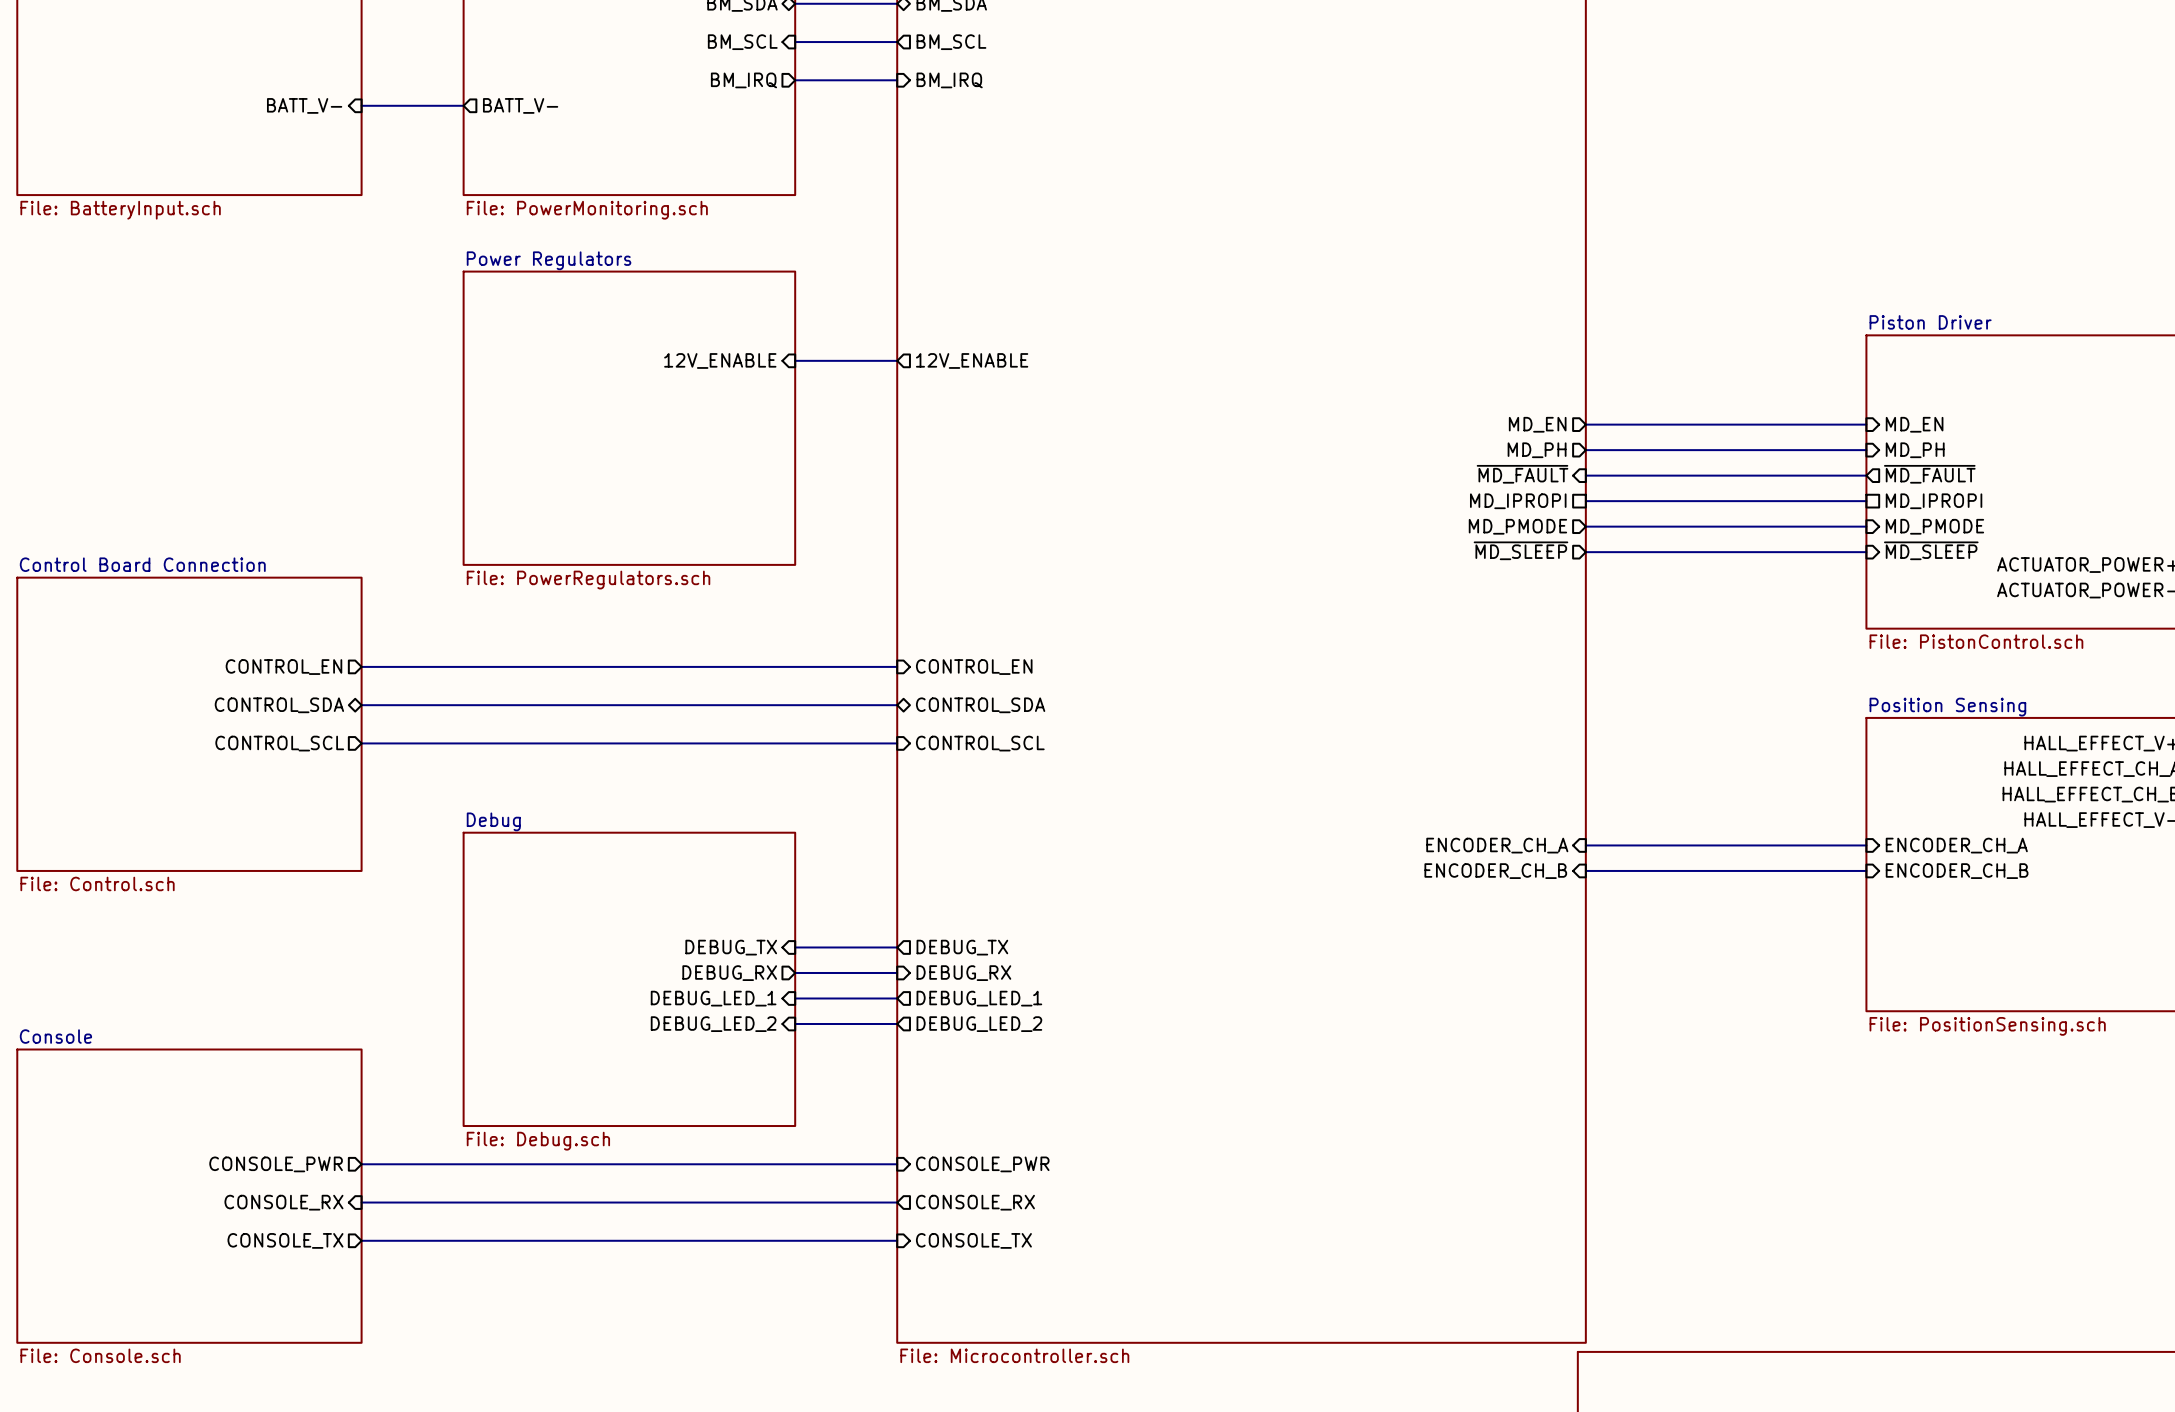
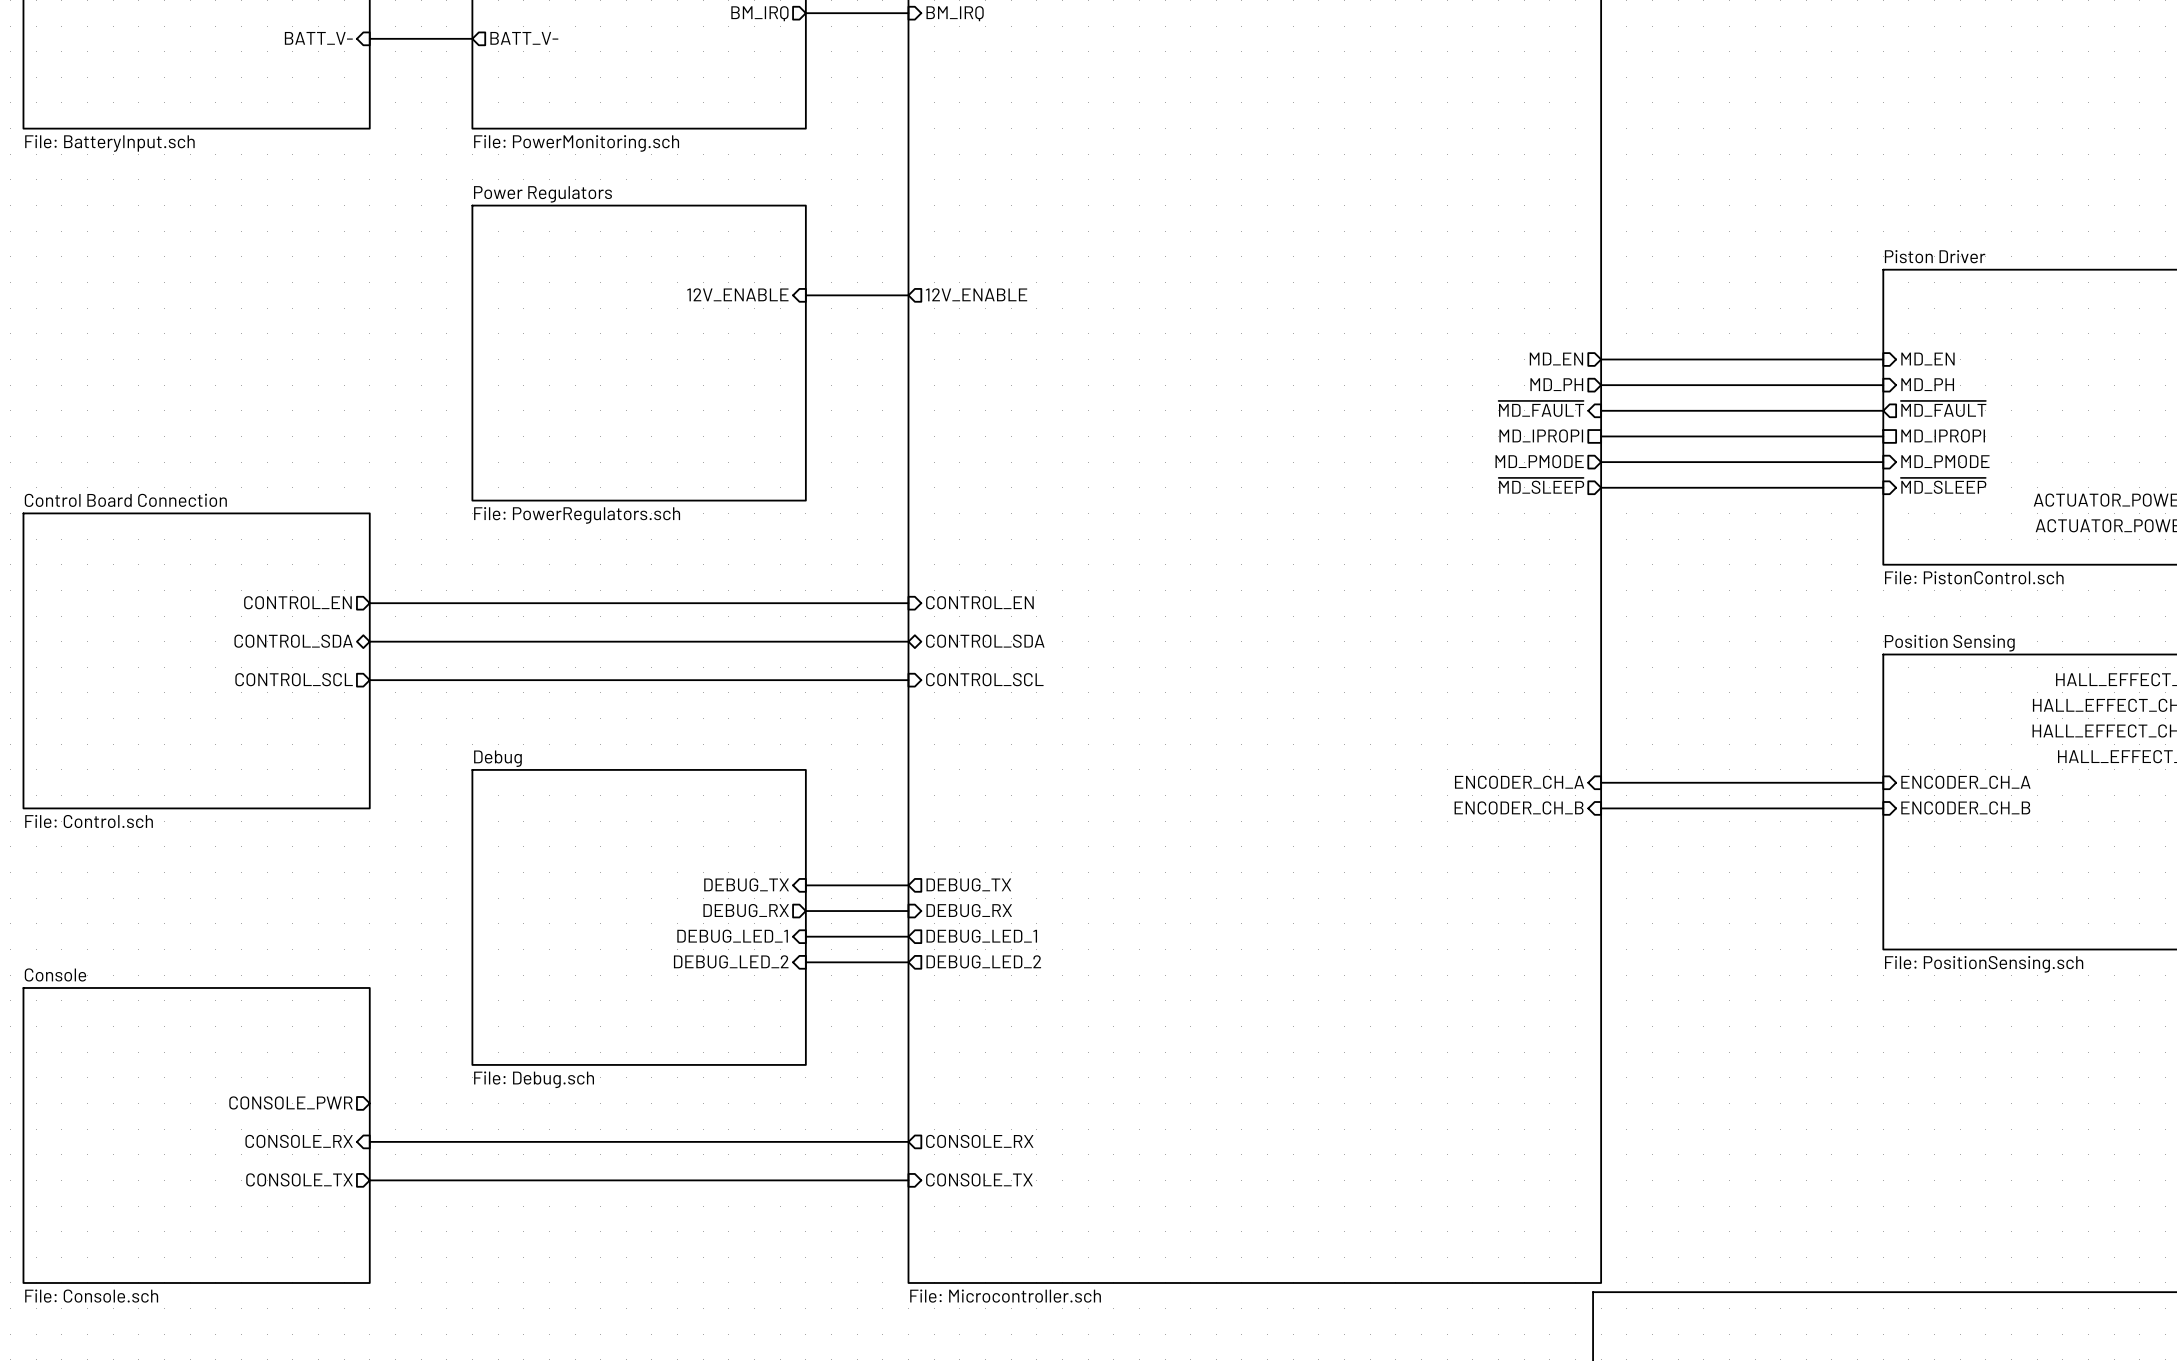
wire: (361, 1164) (897, 1164) -> none
sheet pin: CONSOLE_PWR (982, 1164) -> none

